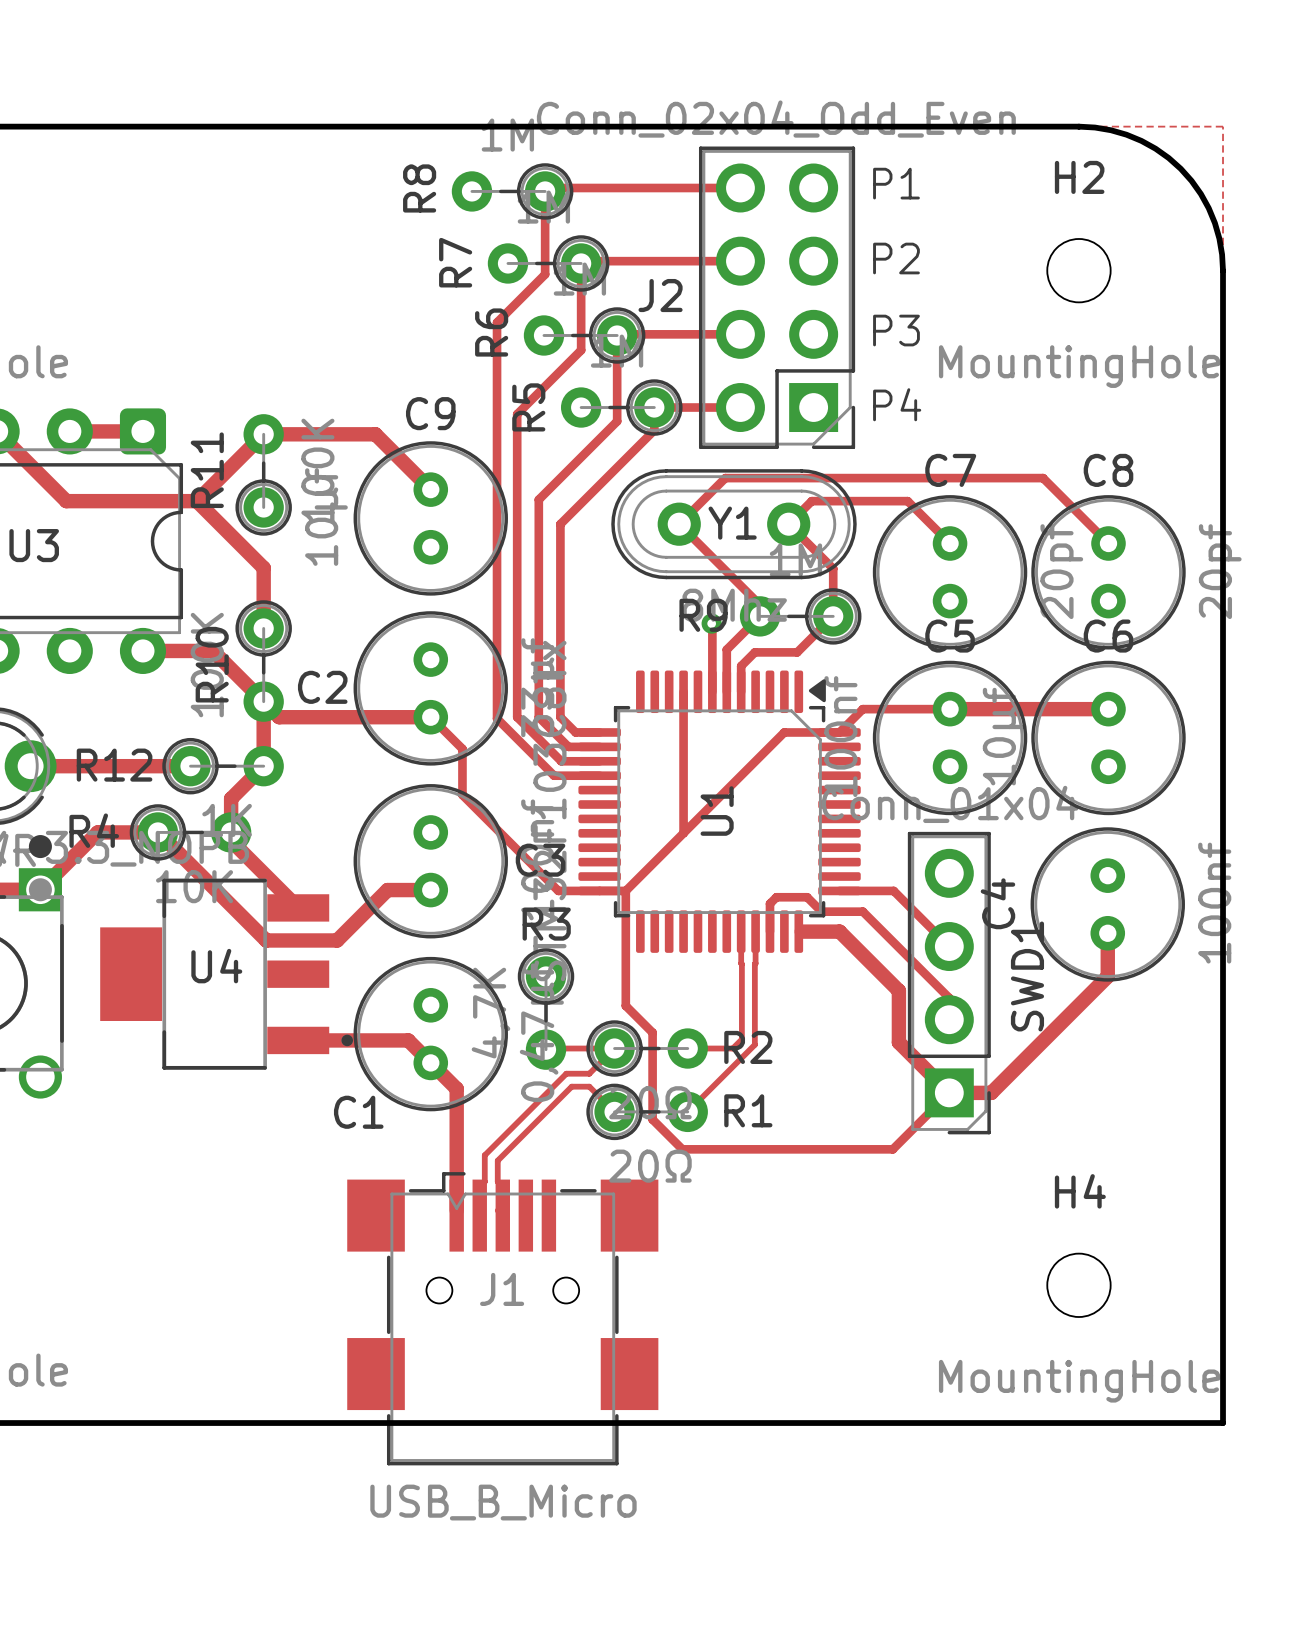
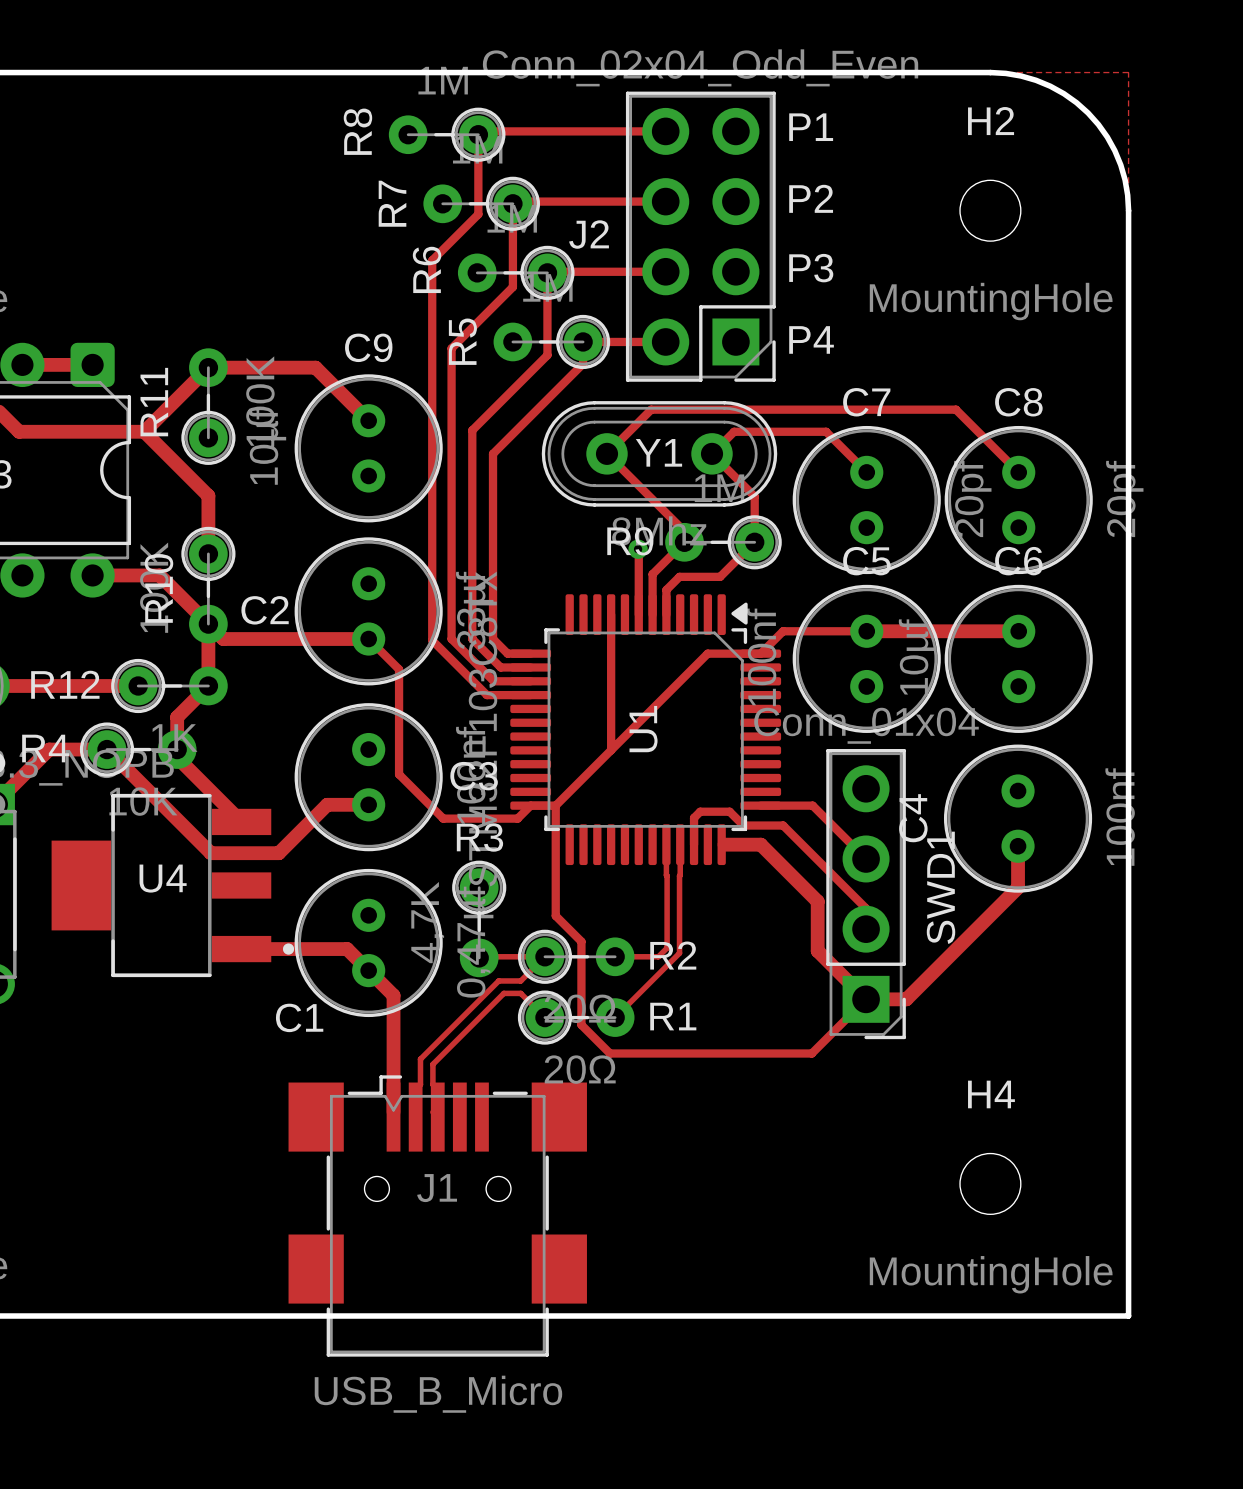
track: (462, 794) (558, 890) (599, 890) -> (399, 713) (399, 774) (443, 818) (517, 818) (530, 805)

